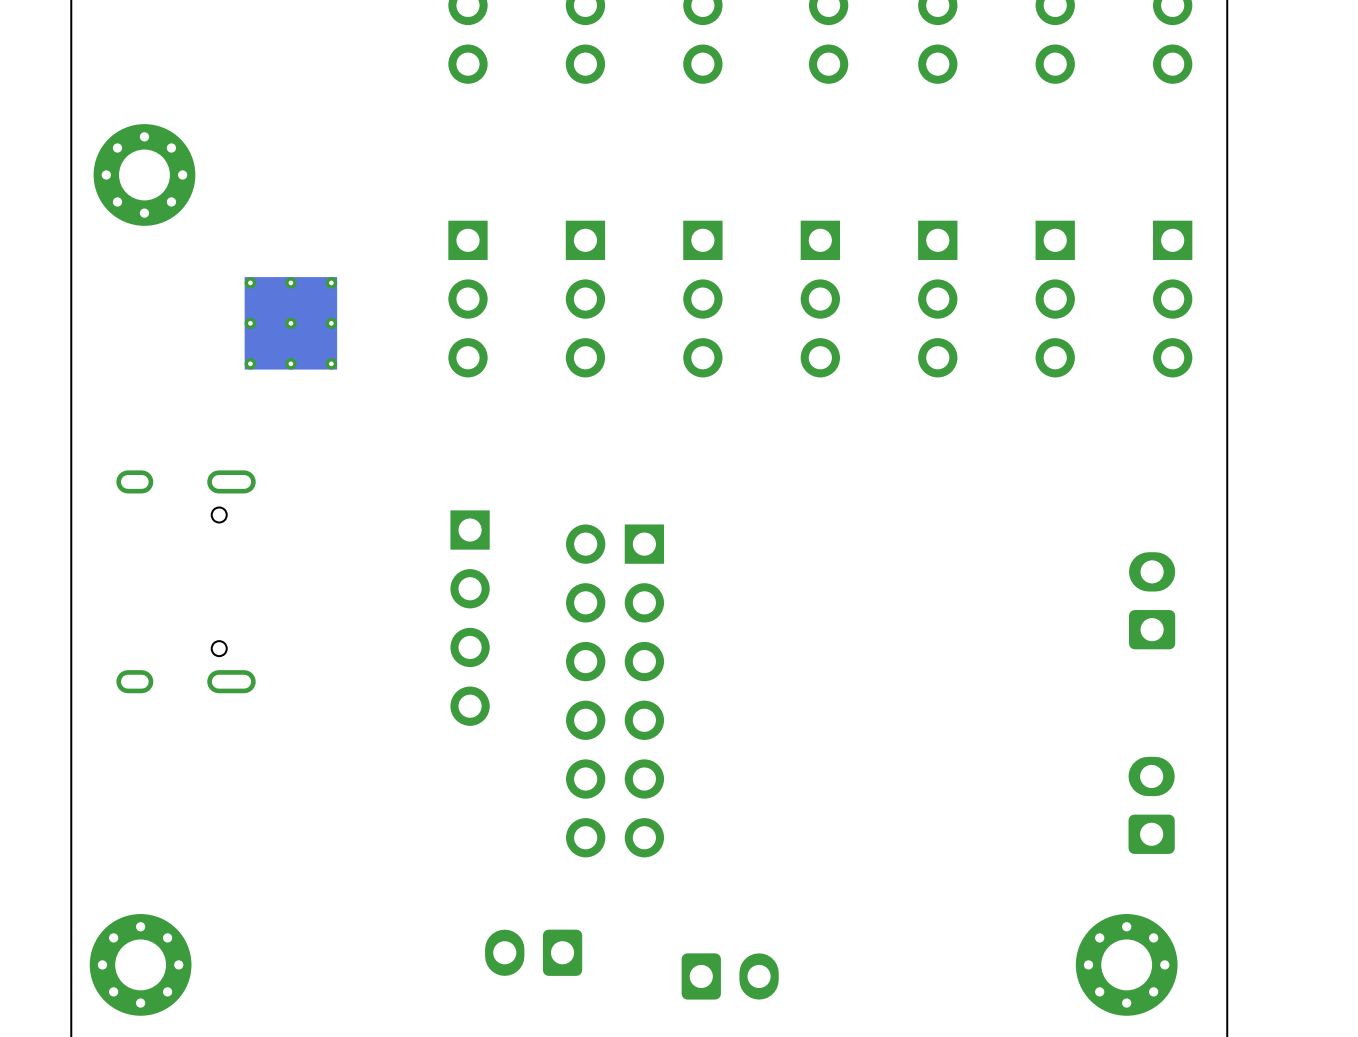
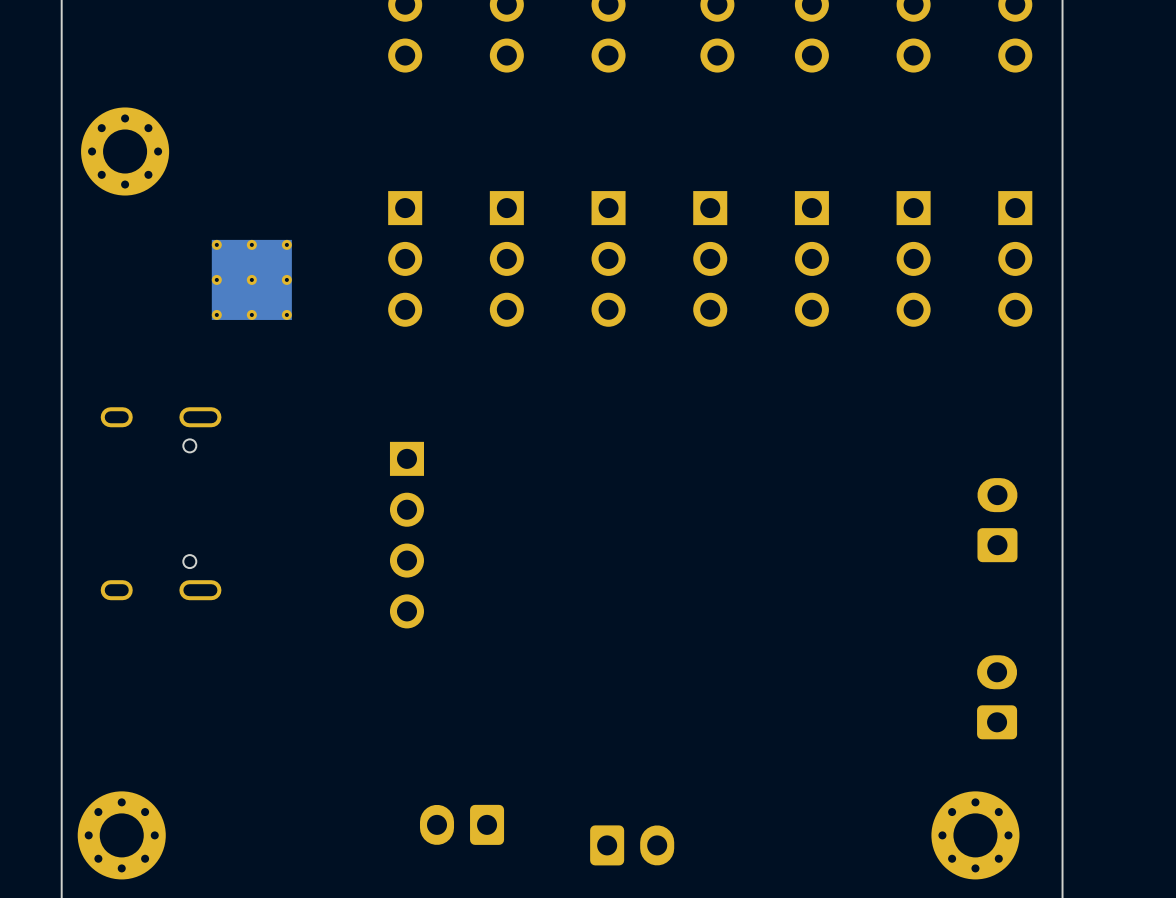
part: (615, 690) -> none

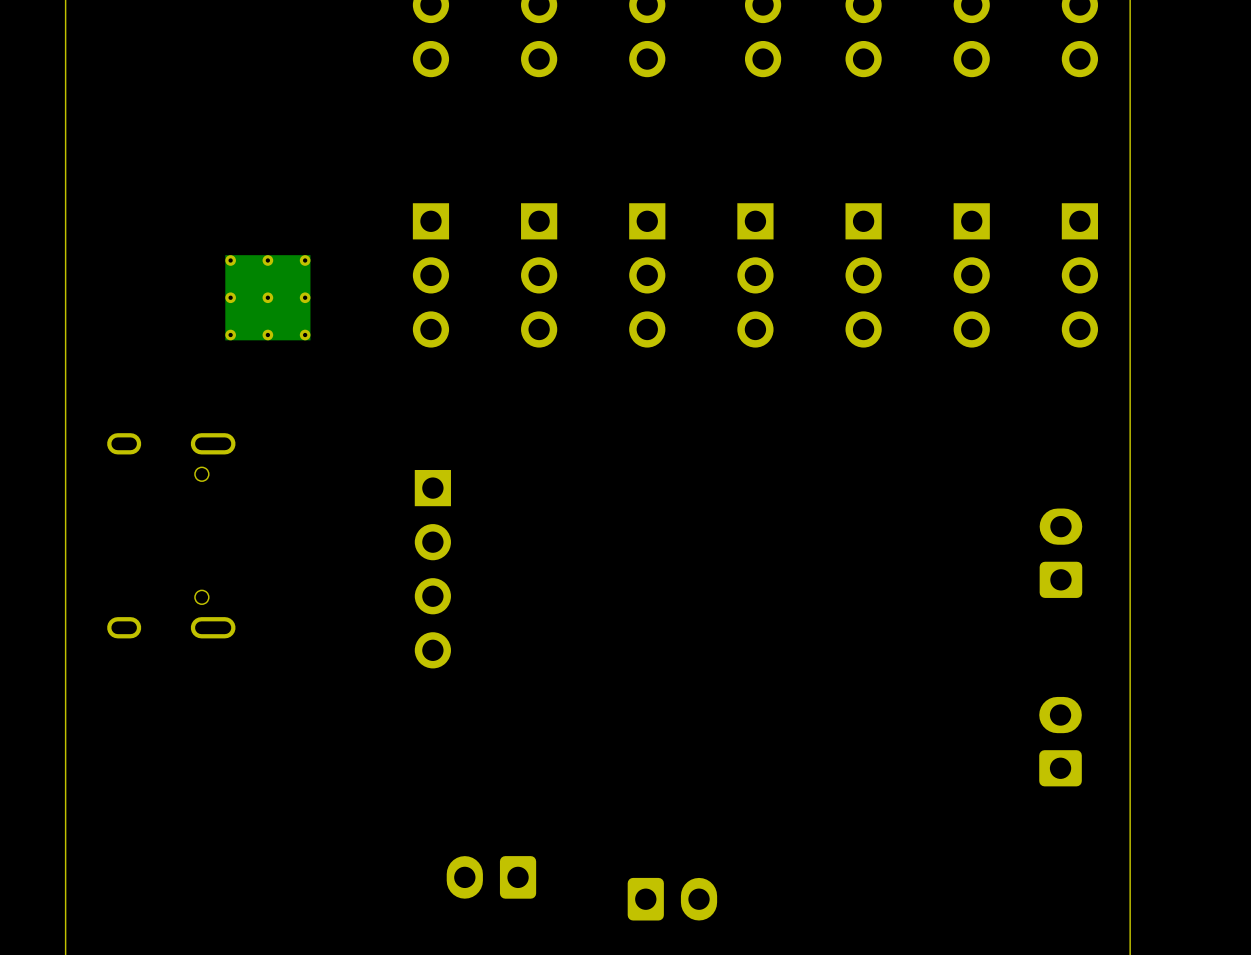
part: (125, 151) -> none
part: (121, 835) -> none
part: (975, 835) -> none

